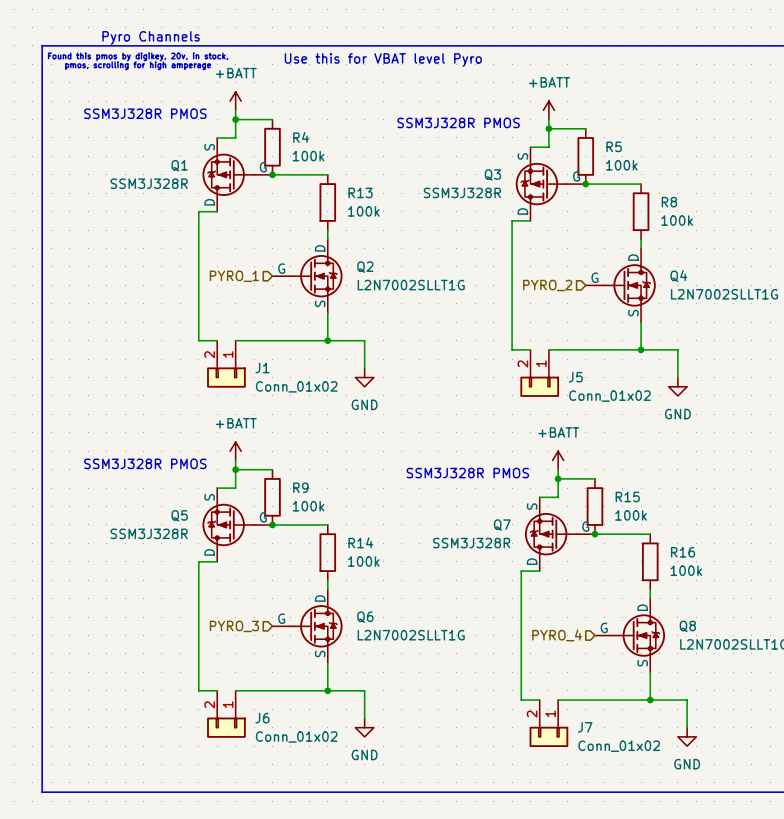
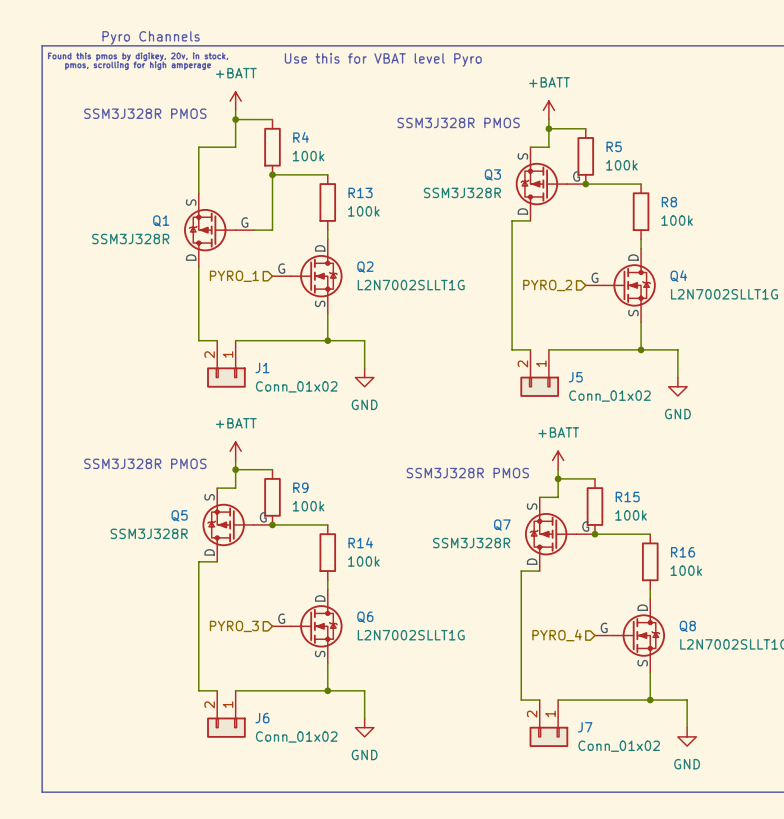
wire: (217, 137) (235, 137) -> (198, 193) (198, 147) (235, 147) (235, 137)
Q1 position: (237, 174) -> (219, 230)
wire: none -> (272, 174) (272, 230) (254, 230)

